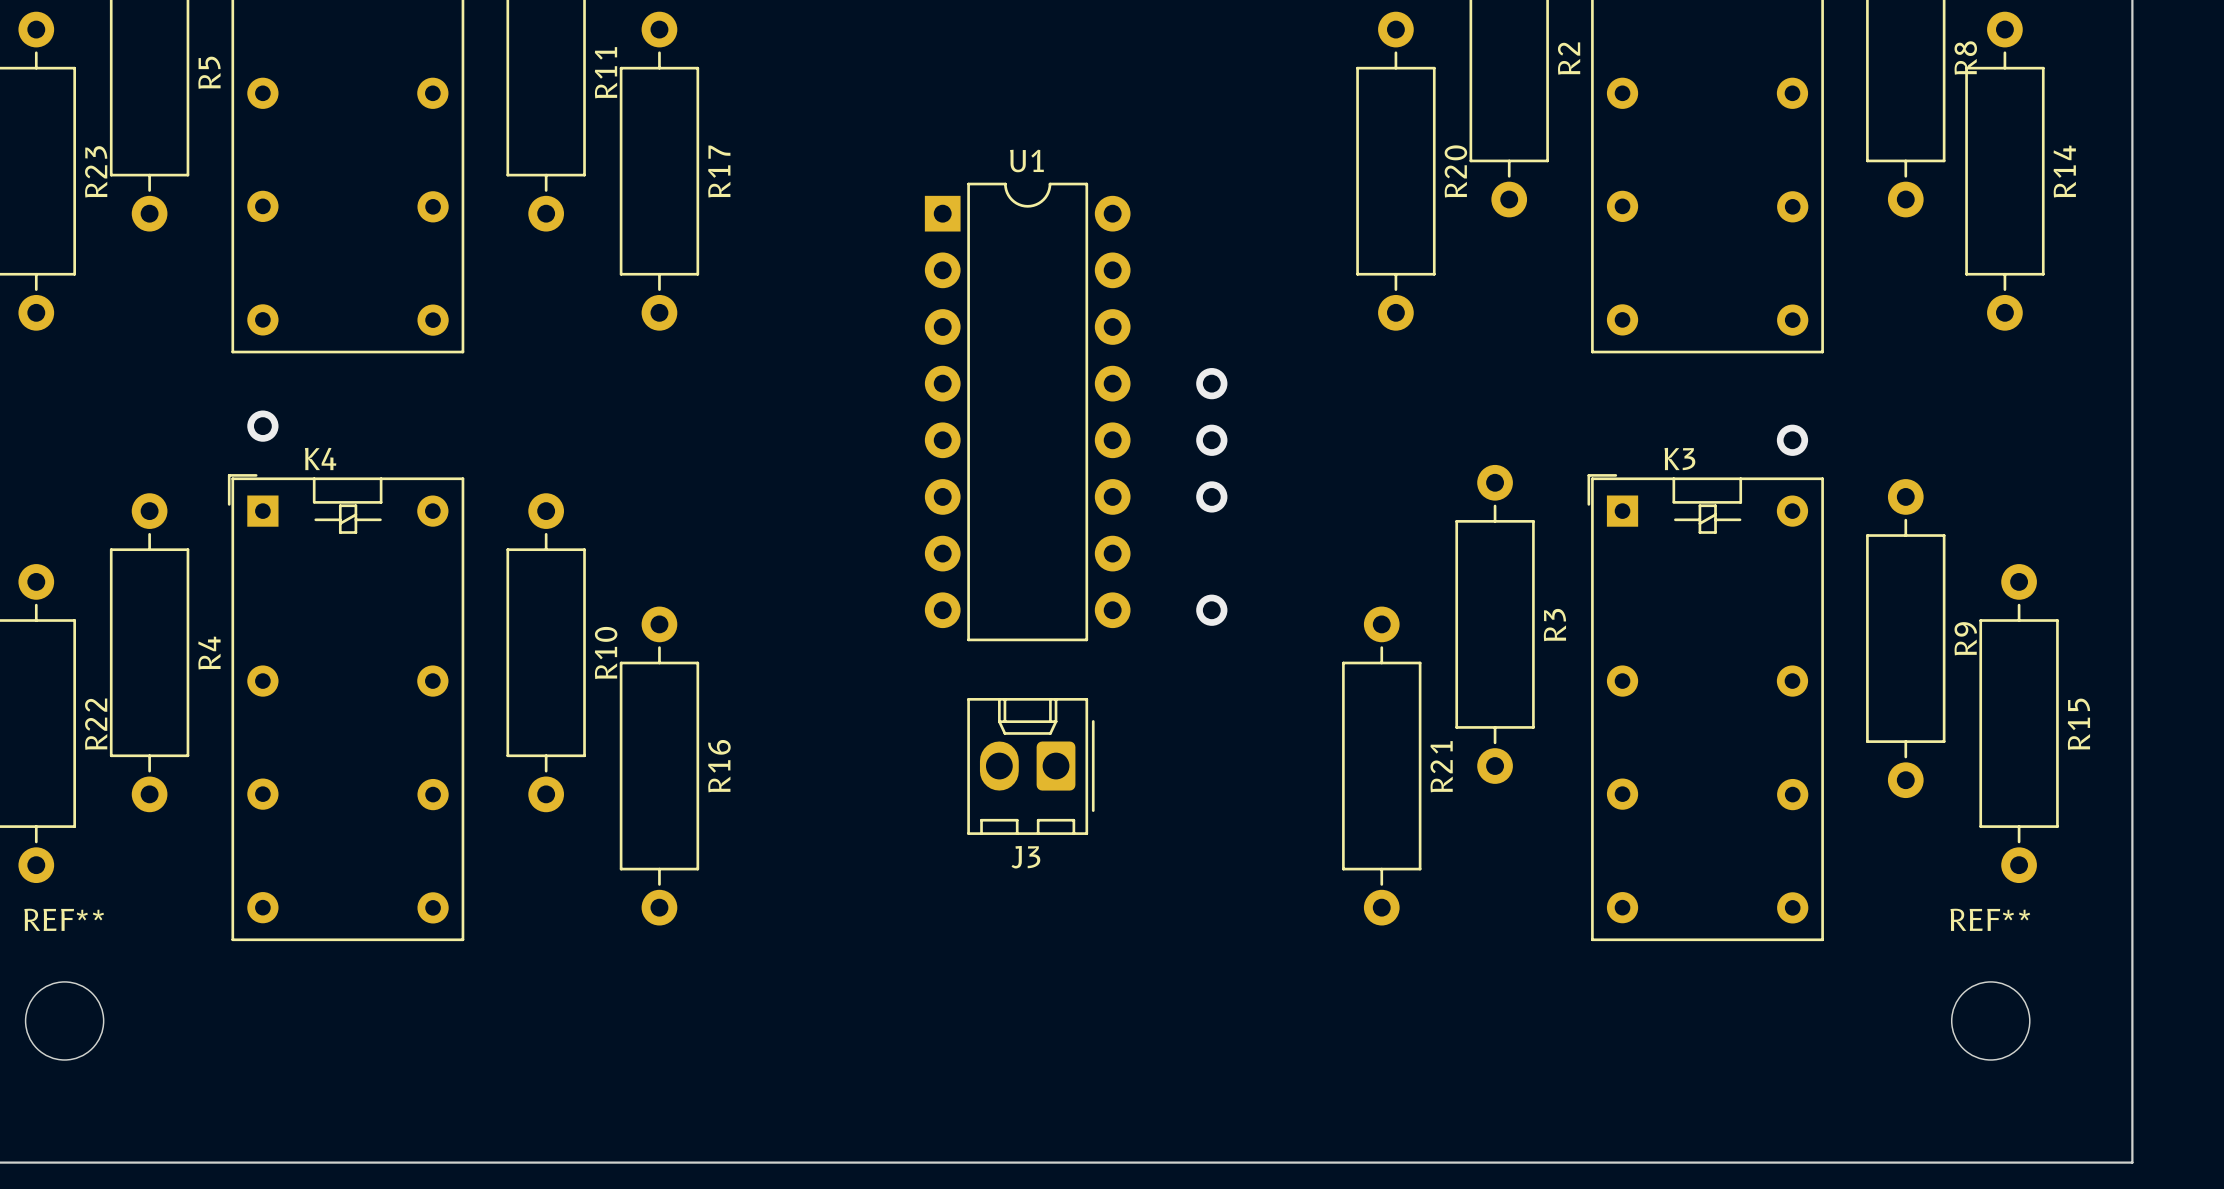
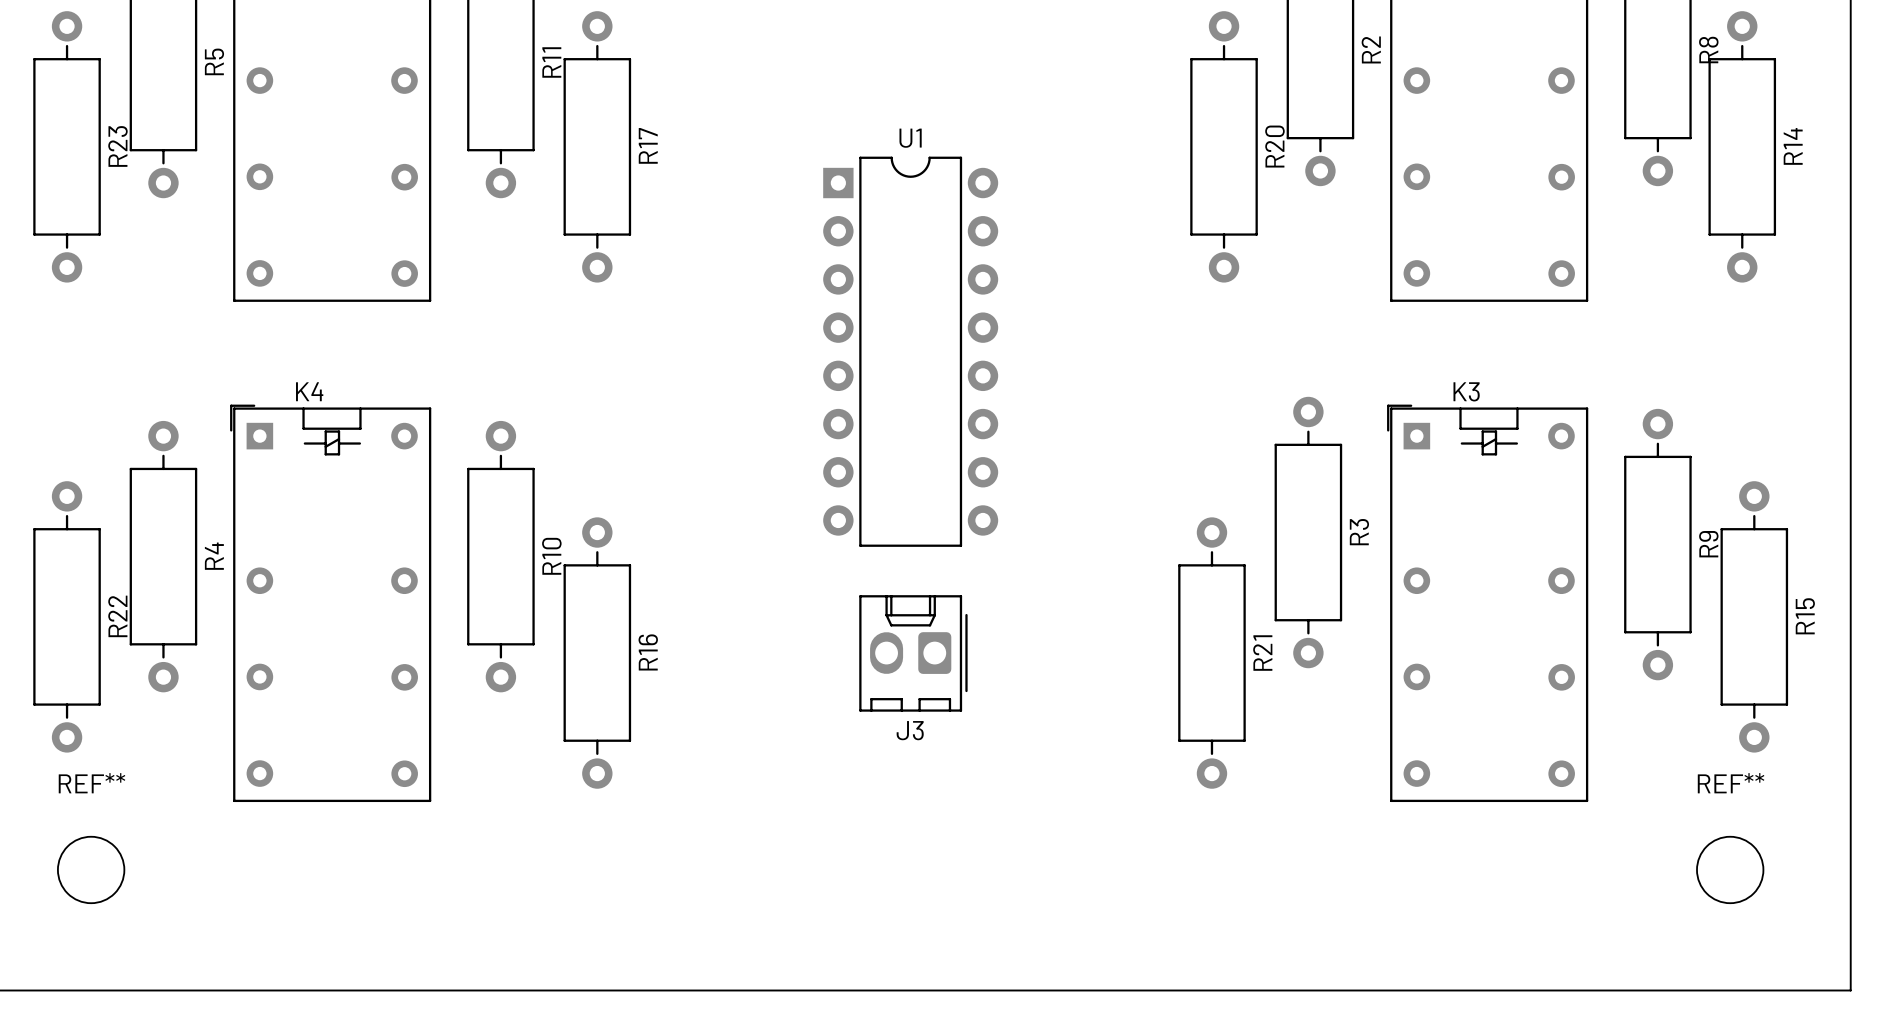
via: (1211, 383) -> none
via: (262, 426) -> none
via: (1211, 440) -> none
via: (1792, 440) -> none
via: (1211, 496) -> none
via: (1211, 610) -> none

